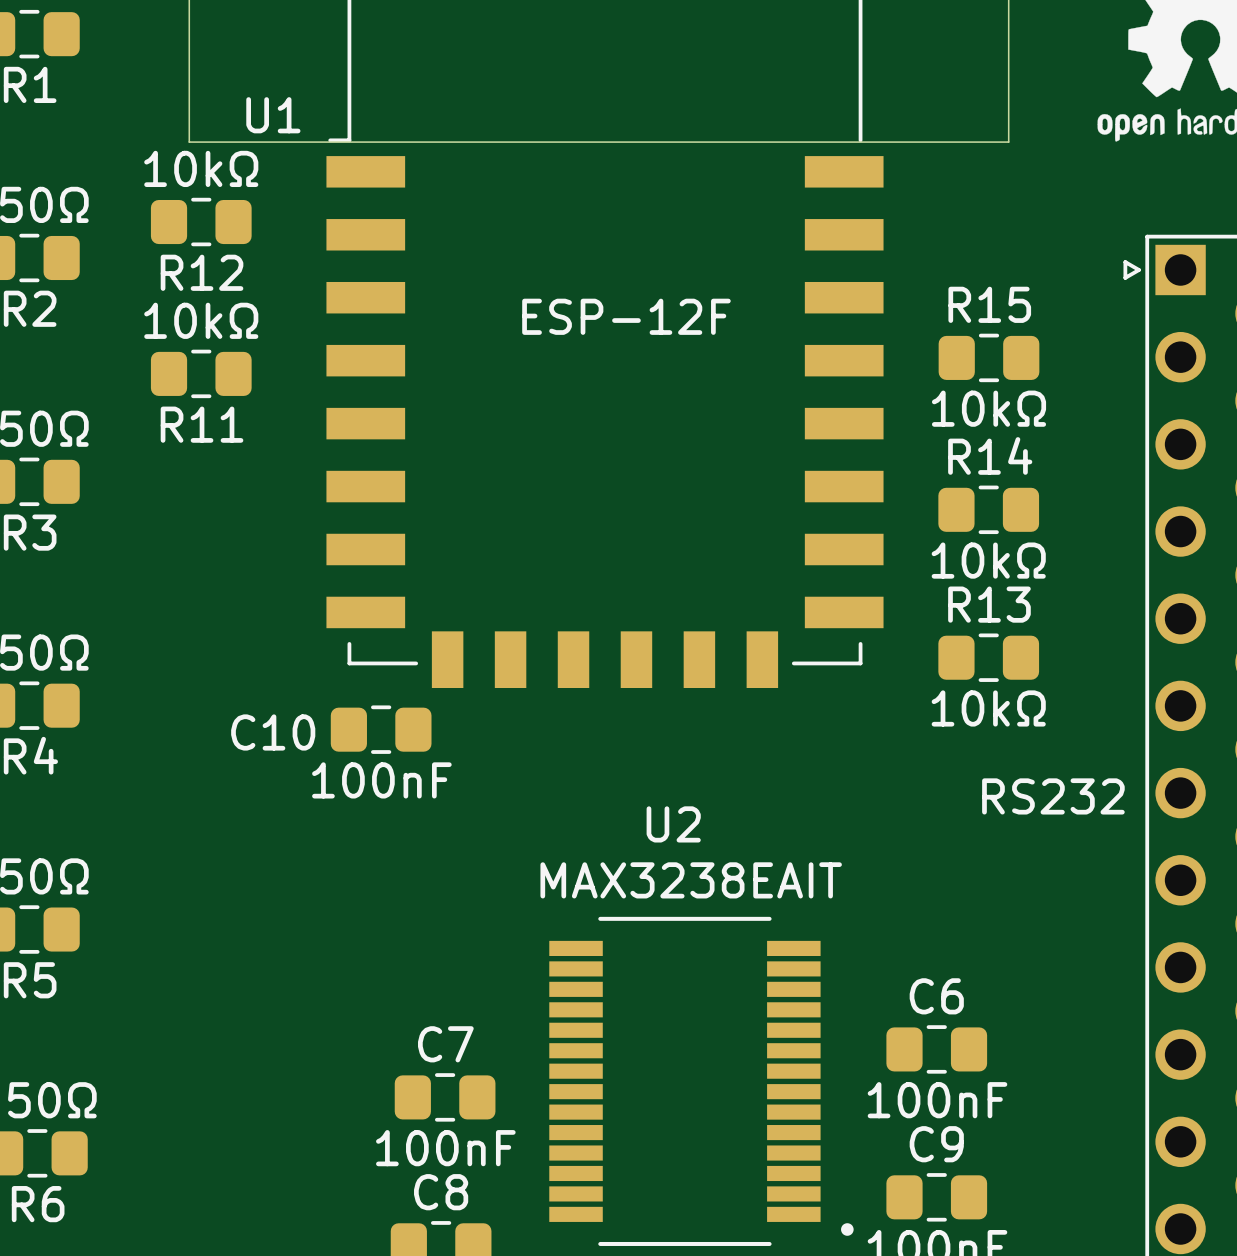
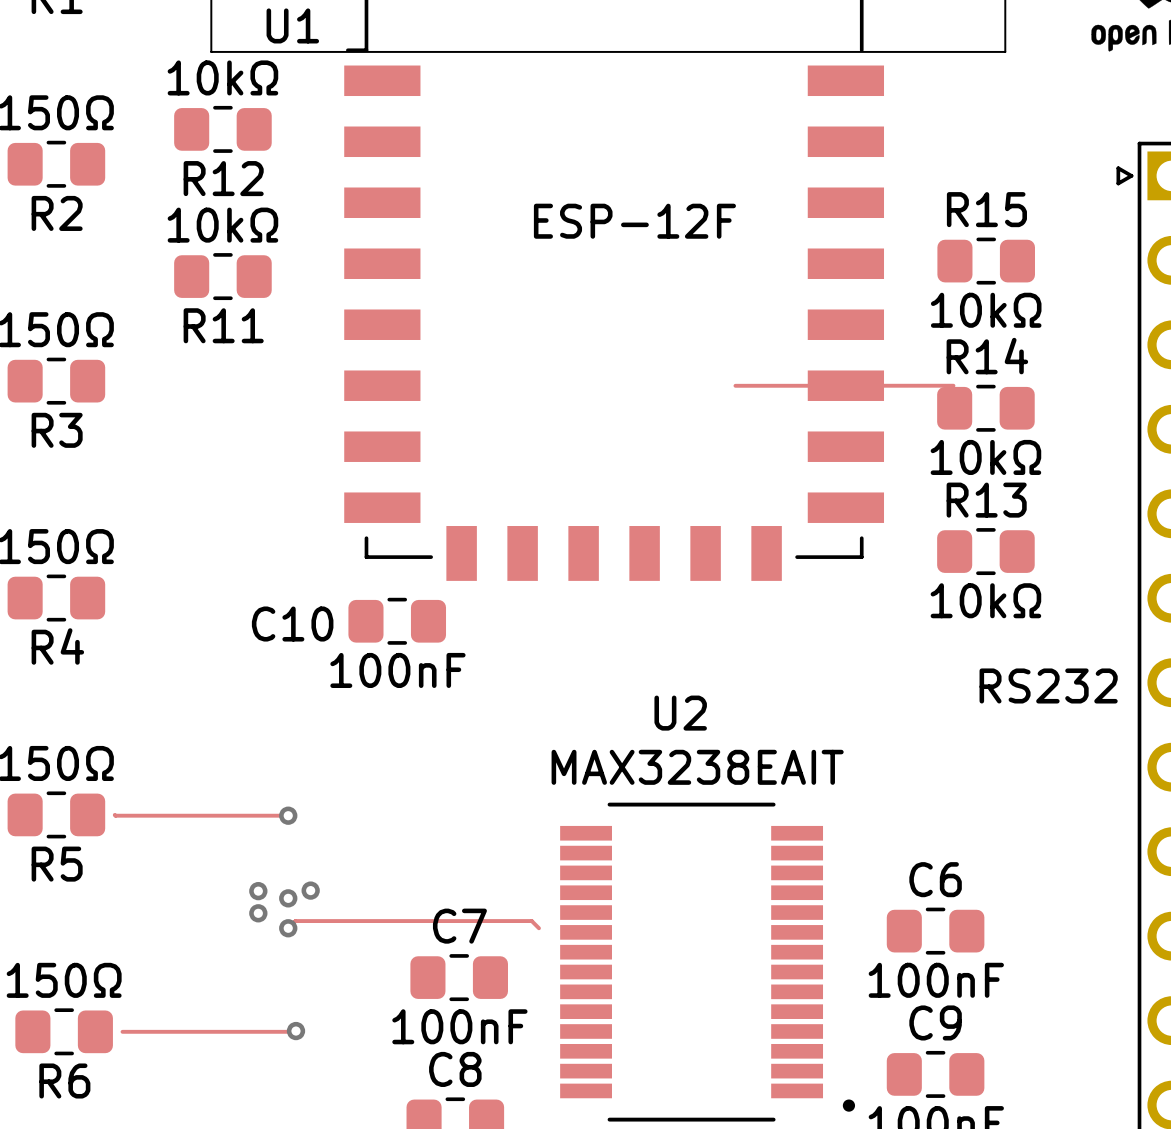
track: none -> (735, 385) (953, 385)
track: none -> (114, 814) (288, 815)
via: none -> (288, 815)
via: none -> (310, 890)
via: none -> (258, 891)
via: none -> (288, 898)
via: none -> (258, 913)
track: none -> (288, 928) (295, 921) (531, 921) (538, 928)
via: none -> (288, 928)
track: none -> (295, 1031) (122, 1031)
via: none -> (295, 1031)

